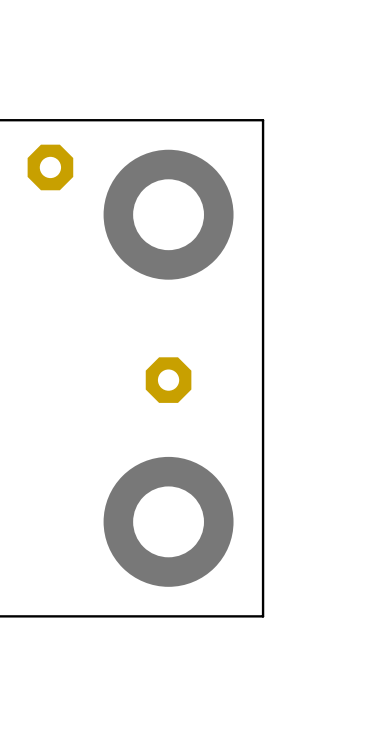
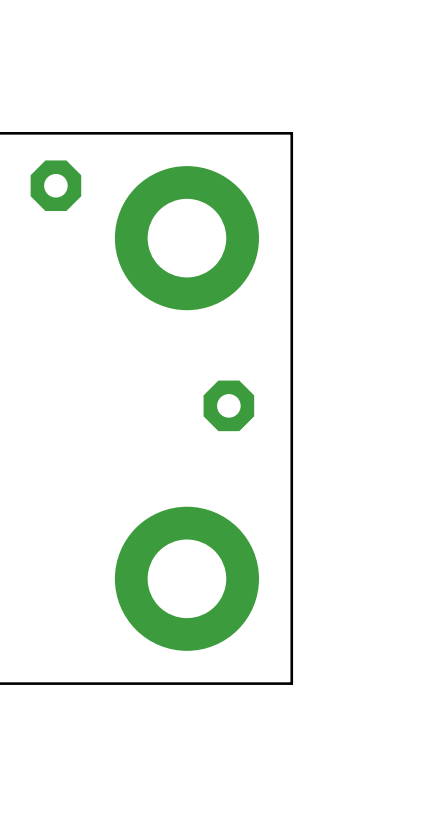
part position: (168, 380) -> (228, 405)

